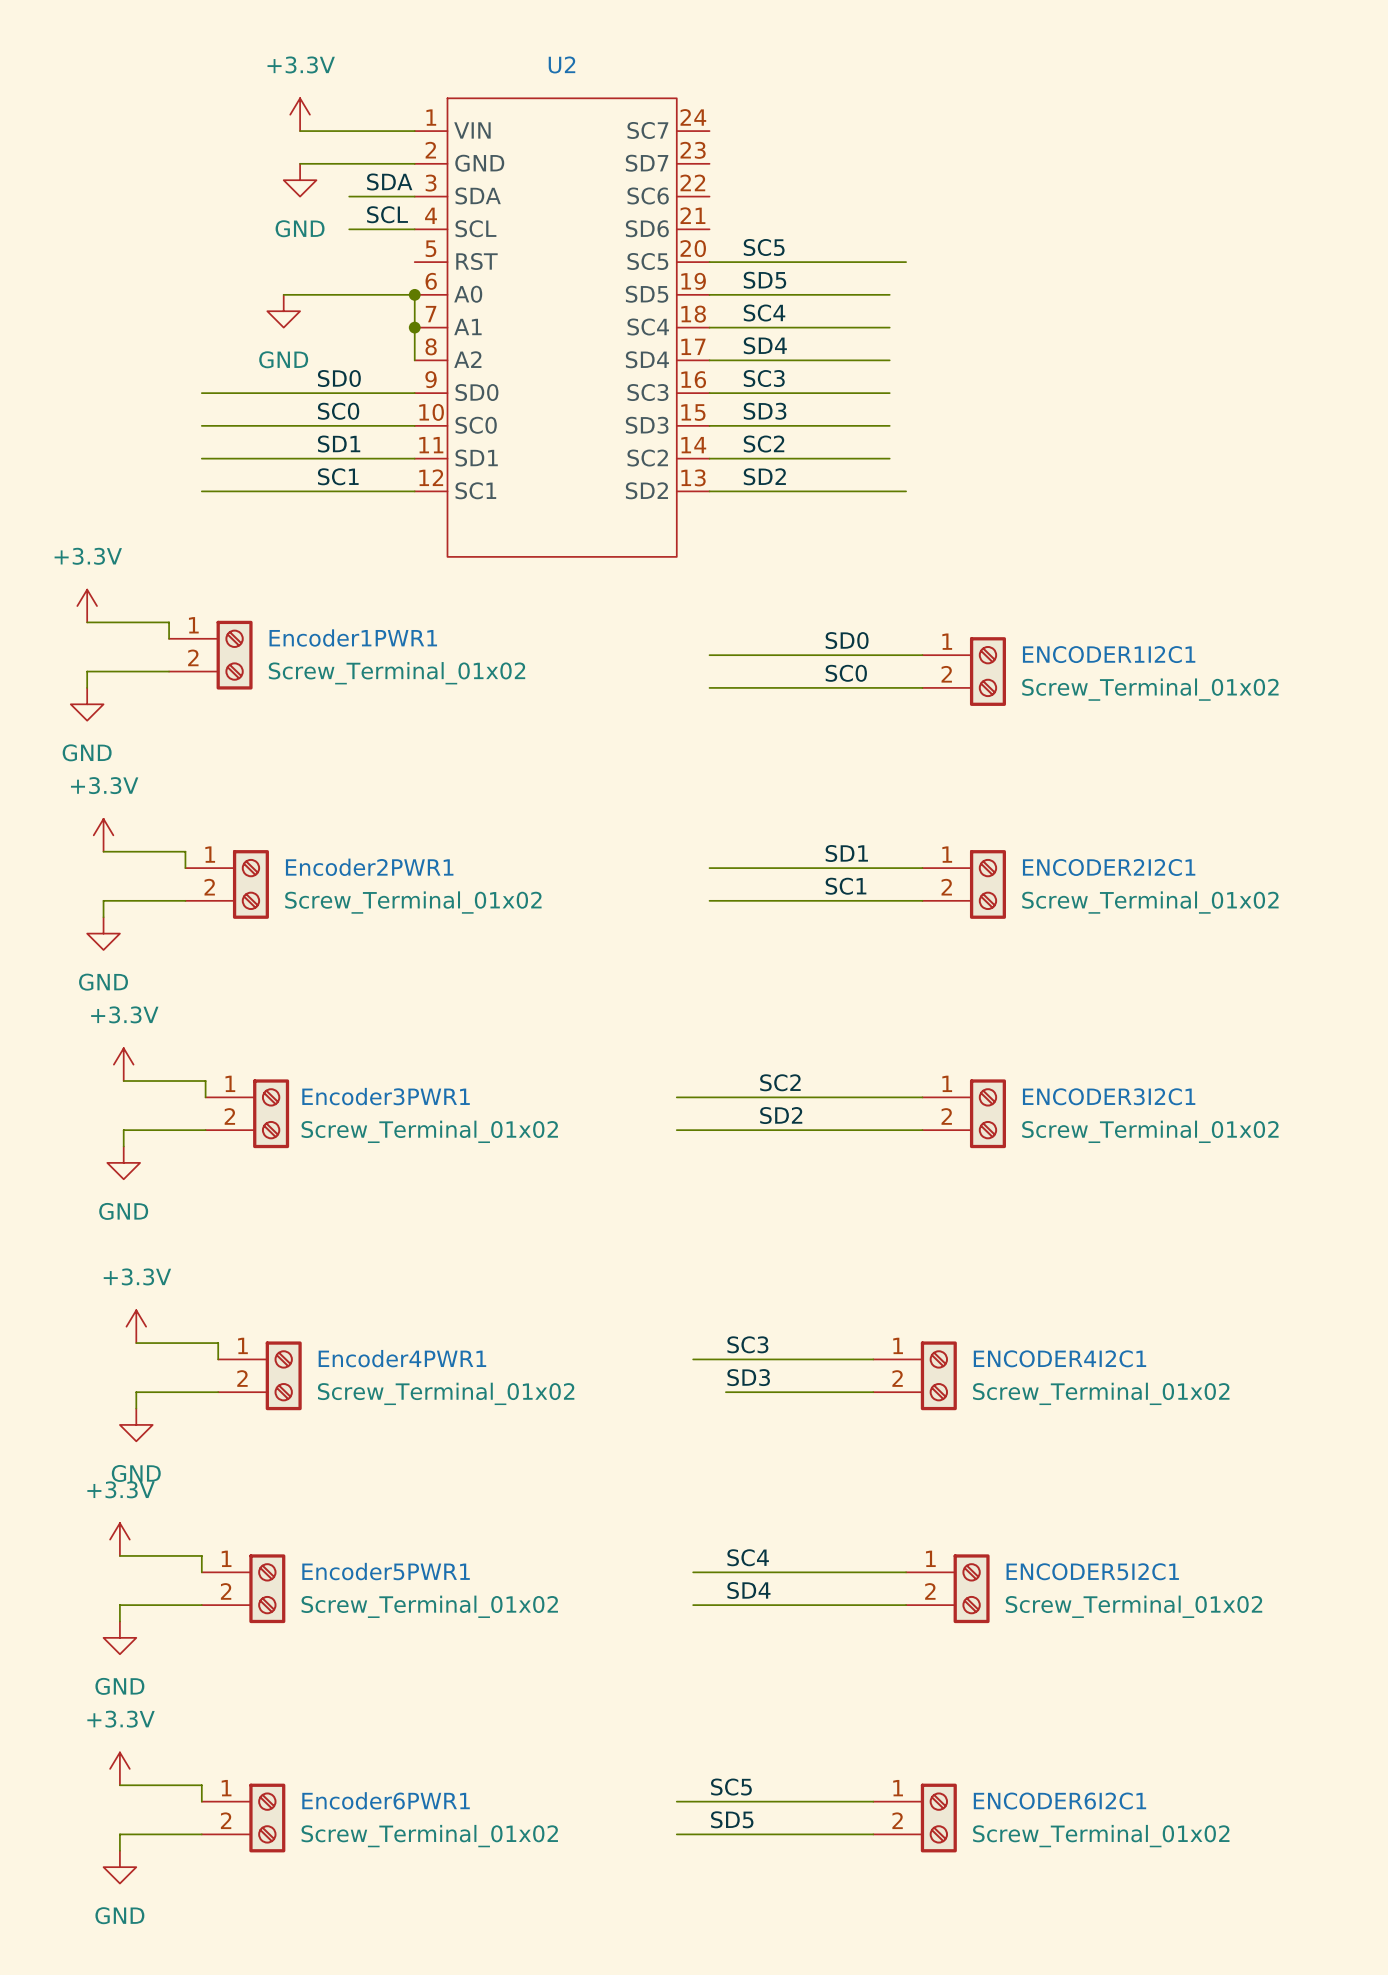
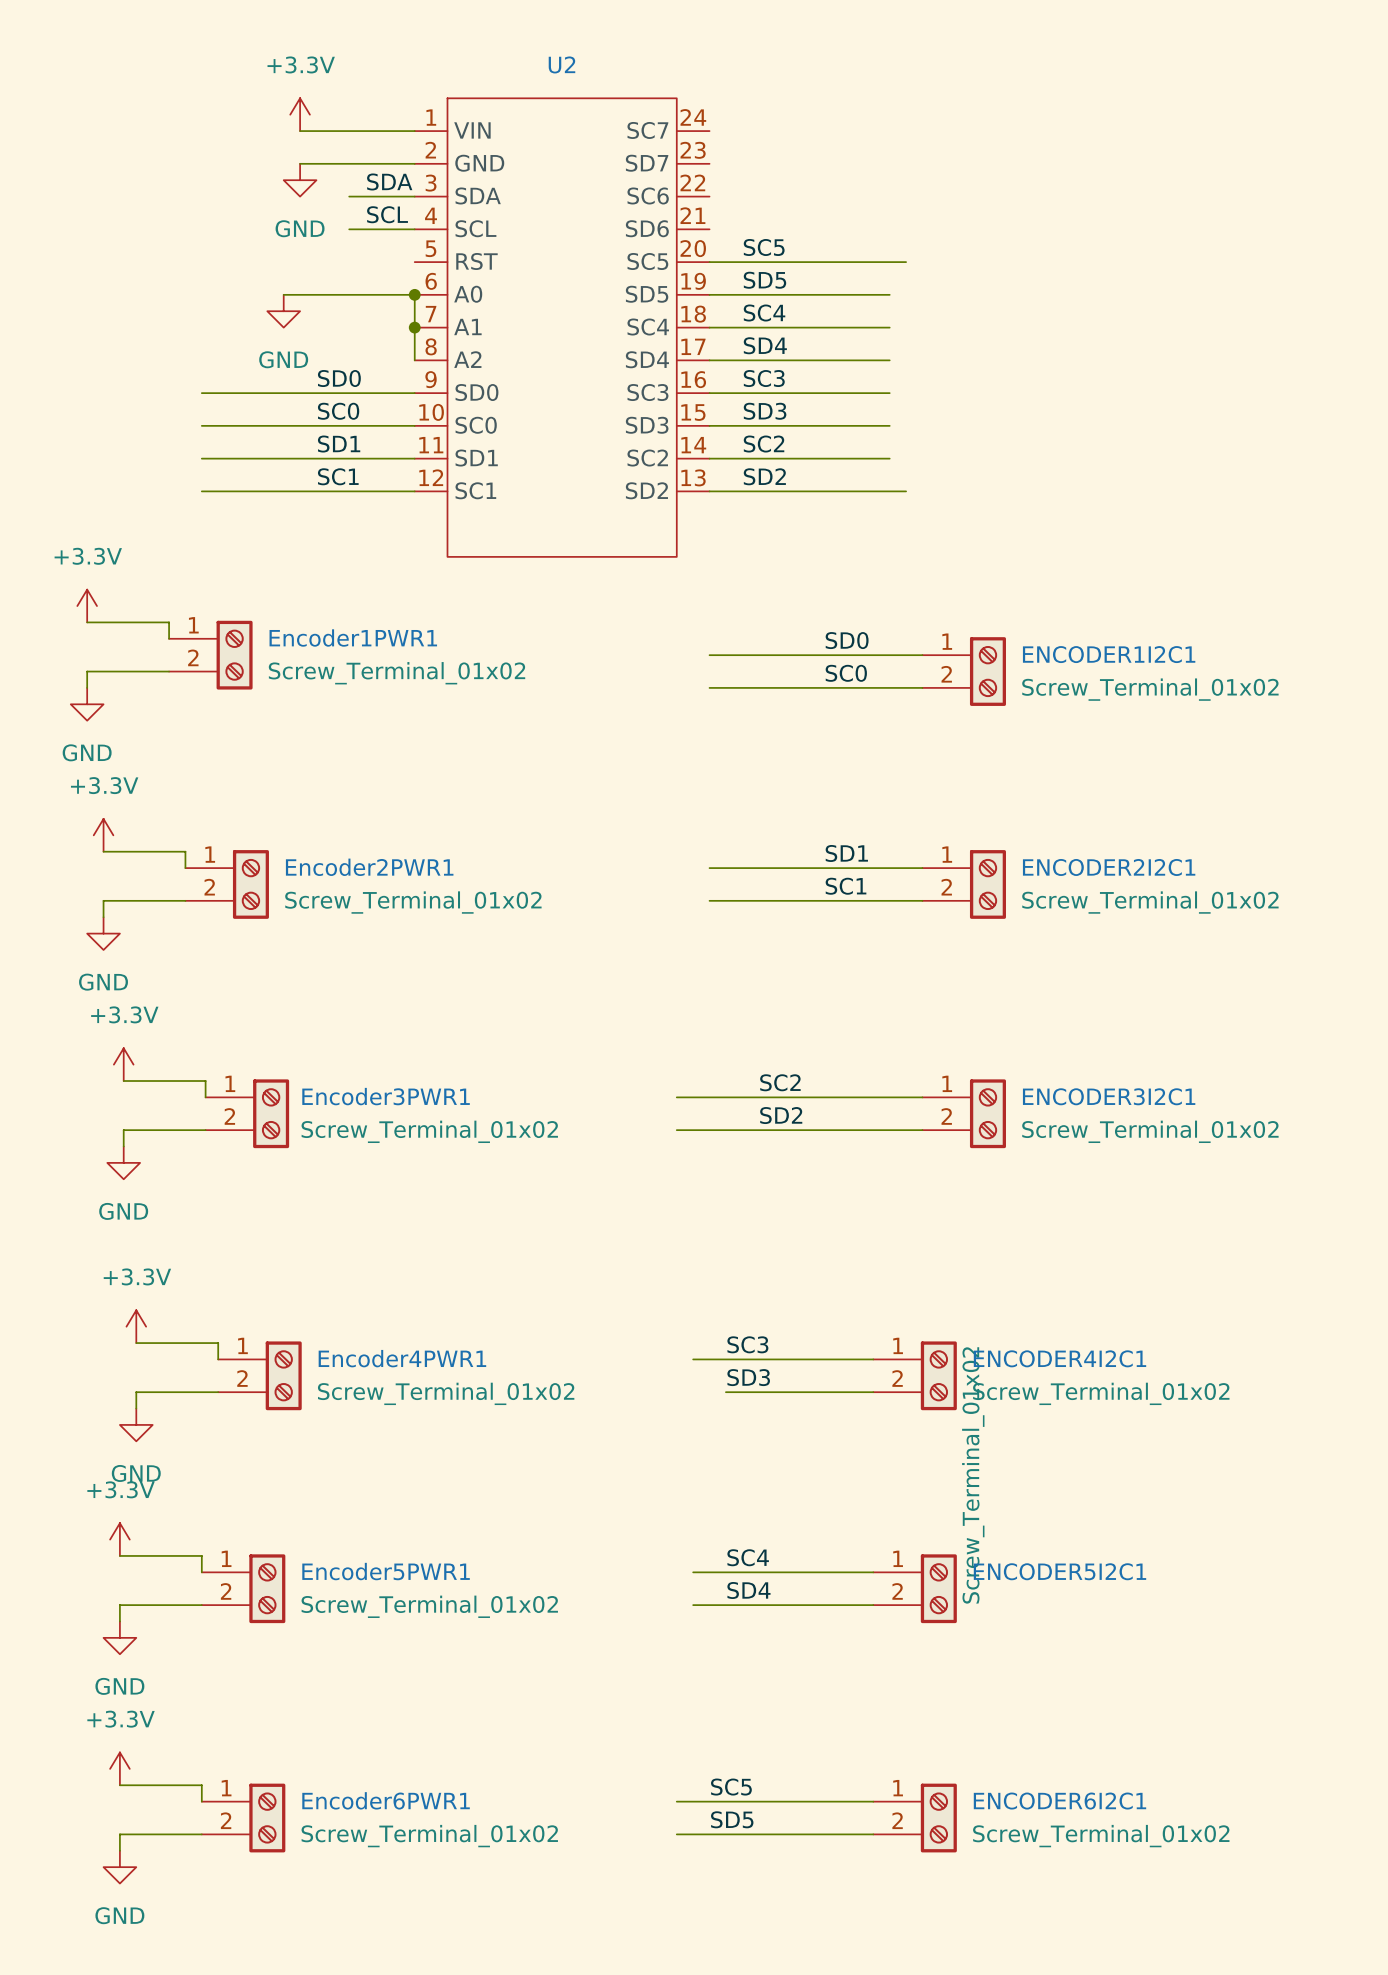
ENCODER5I2C1 position: (947, 1588) -> (915, 1588)
ENCODER5I2C1 value rotation: 0° (1134, 1606) -> 90° counterclockwise (973, 1475)

